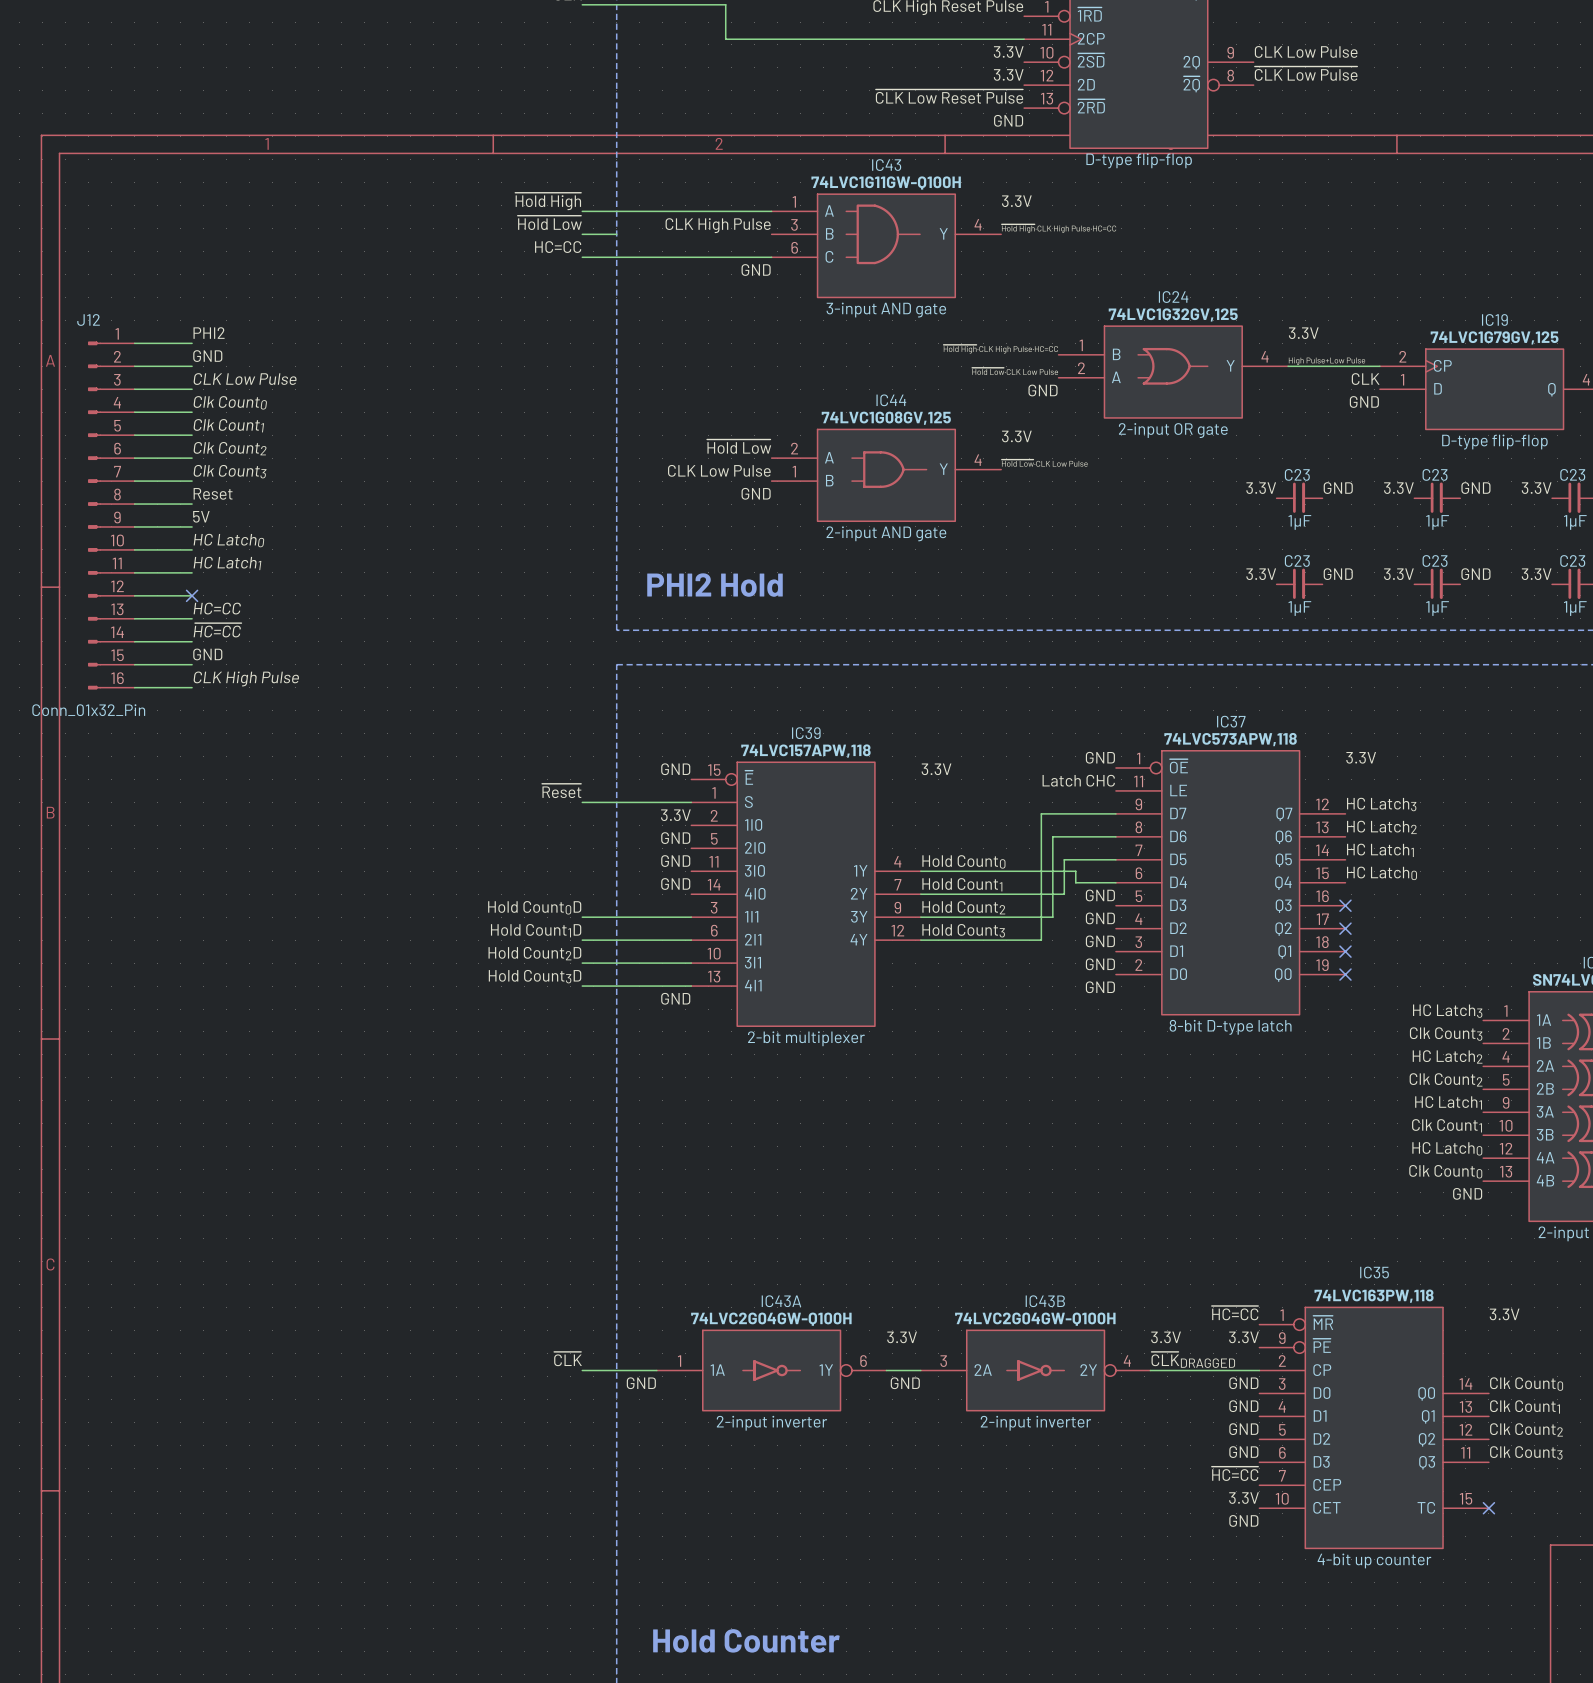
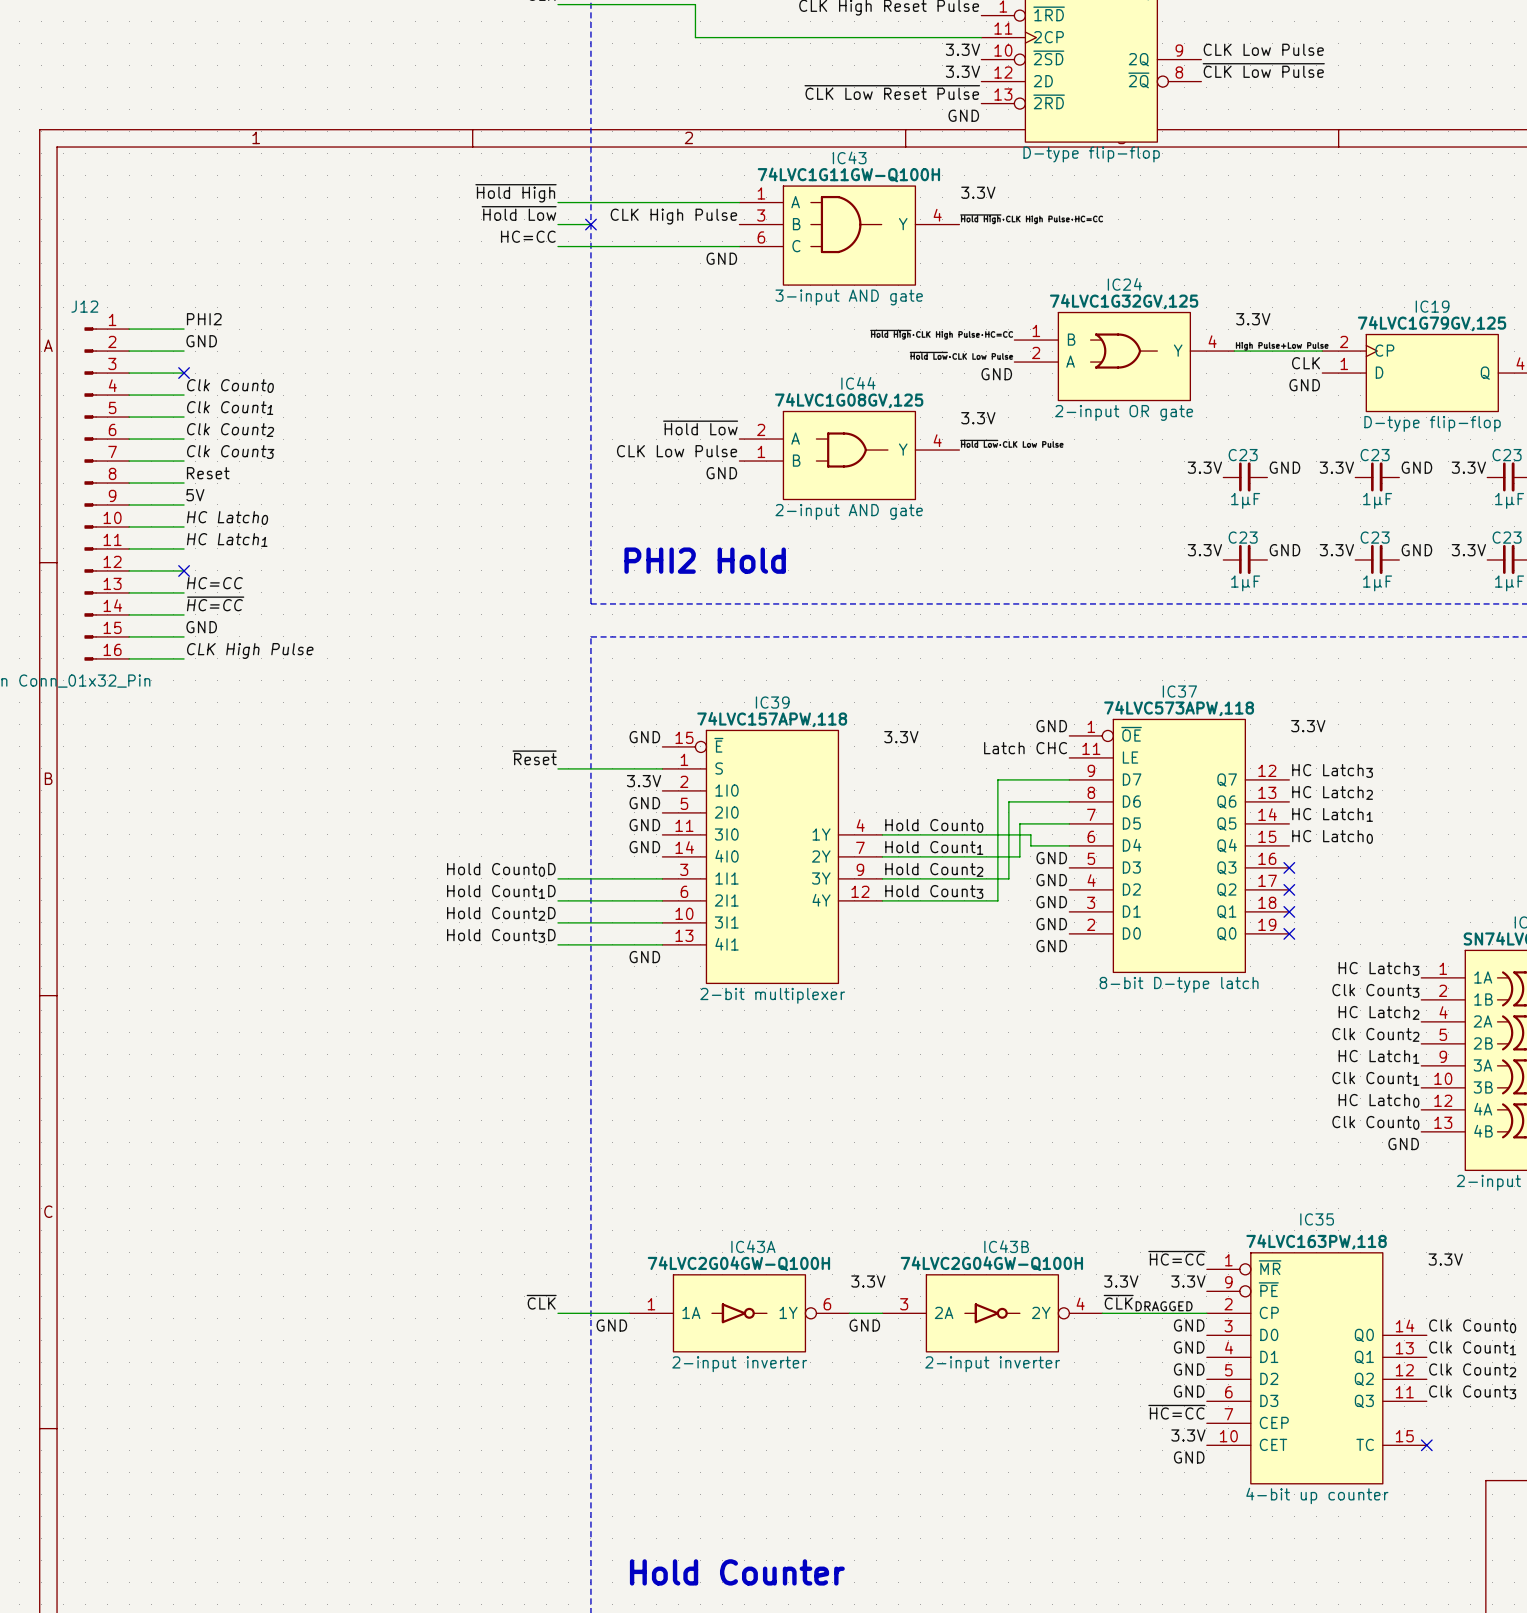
no-connect mark: none -> (590, 224)
label: CLK Low Pulse (245, 379) -> none
no-connect mark: none -> (184, 373)

